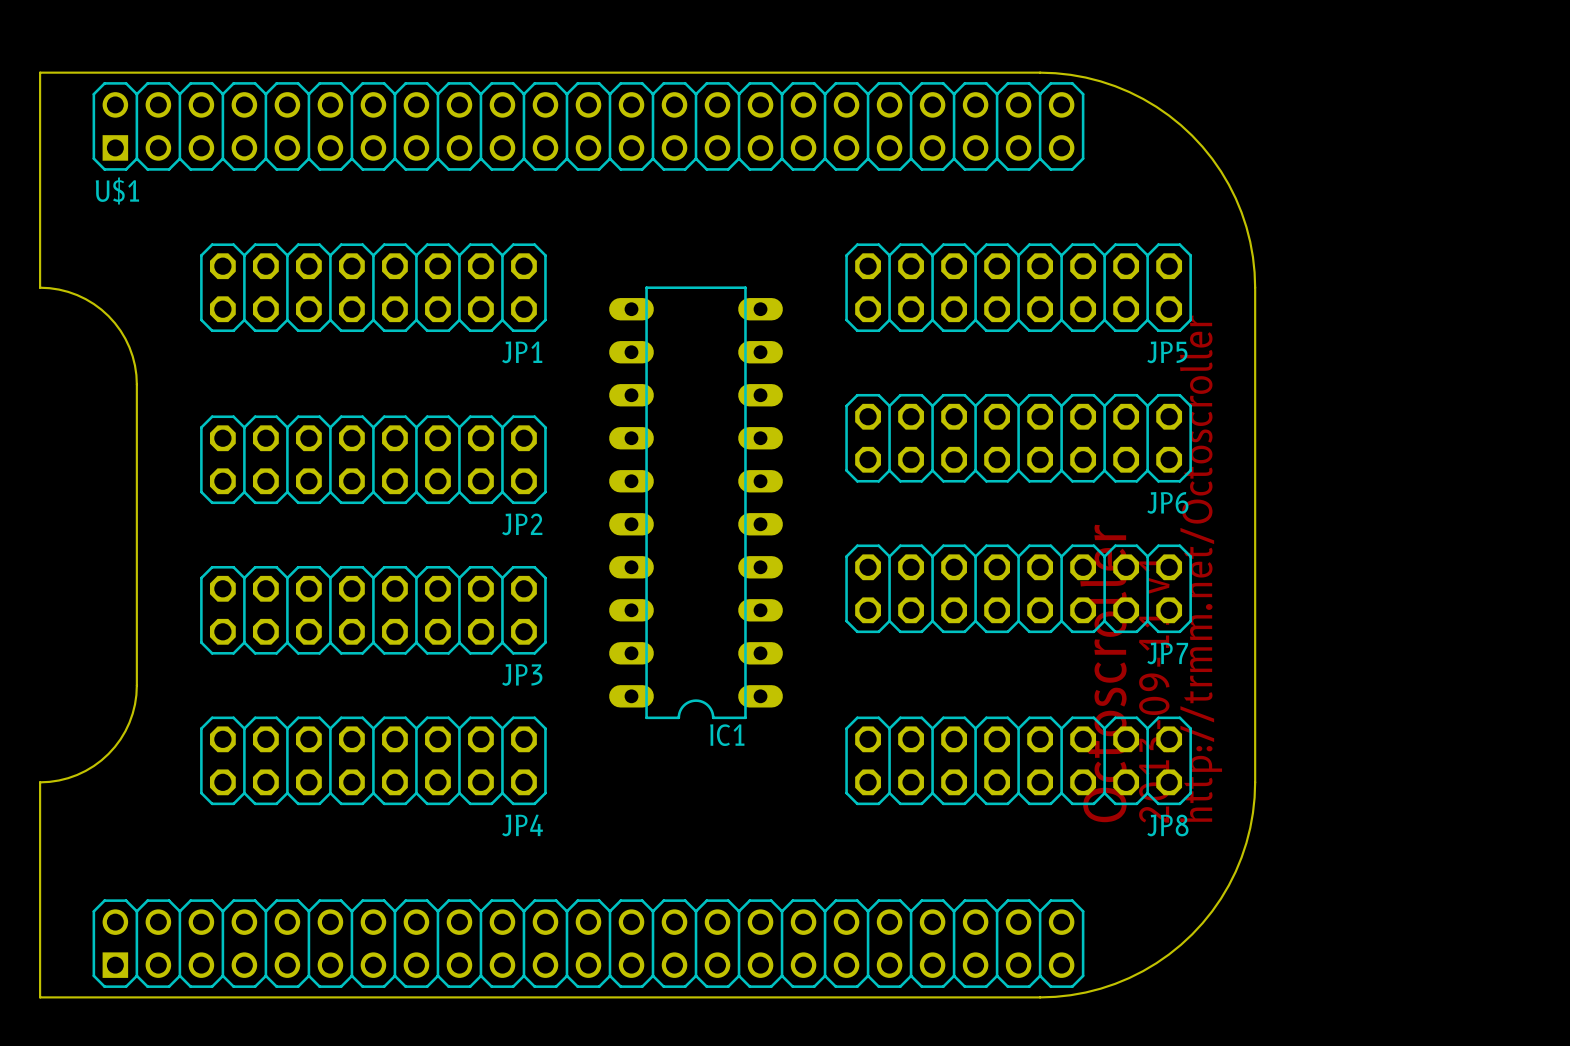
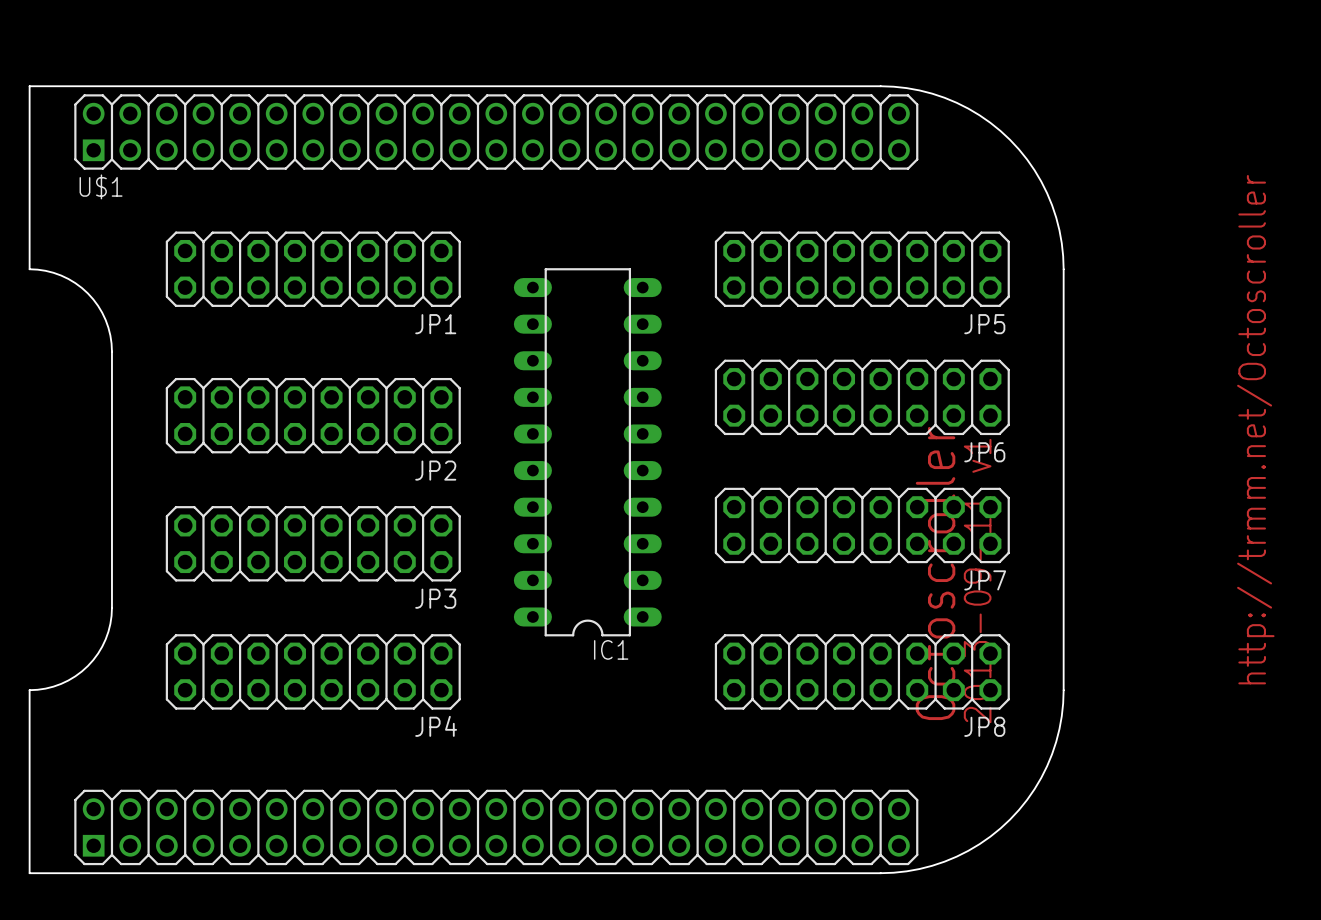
text position: http://trmm.net/Octoscroller (1201, 568) -> http://trmm.net/Octoscroller (1255, 429)

